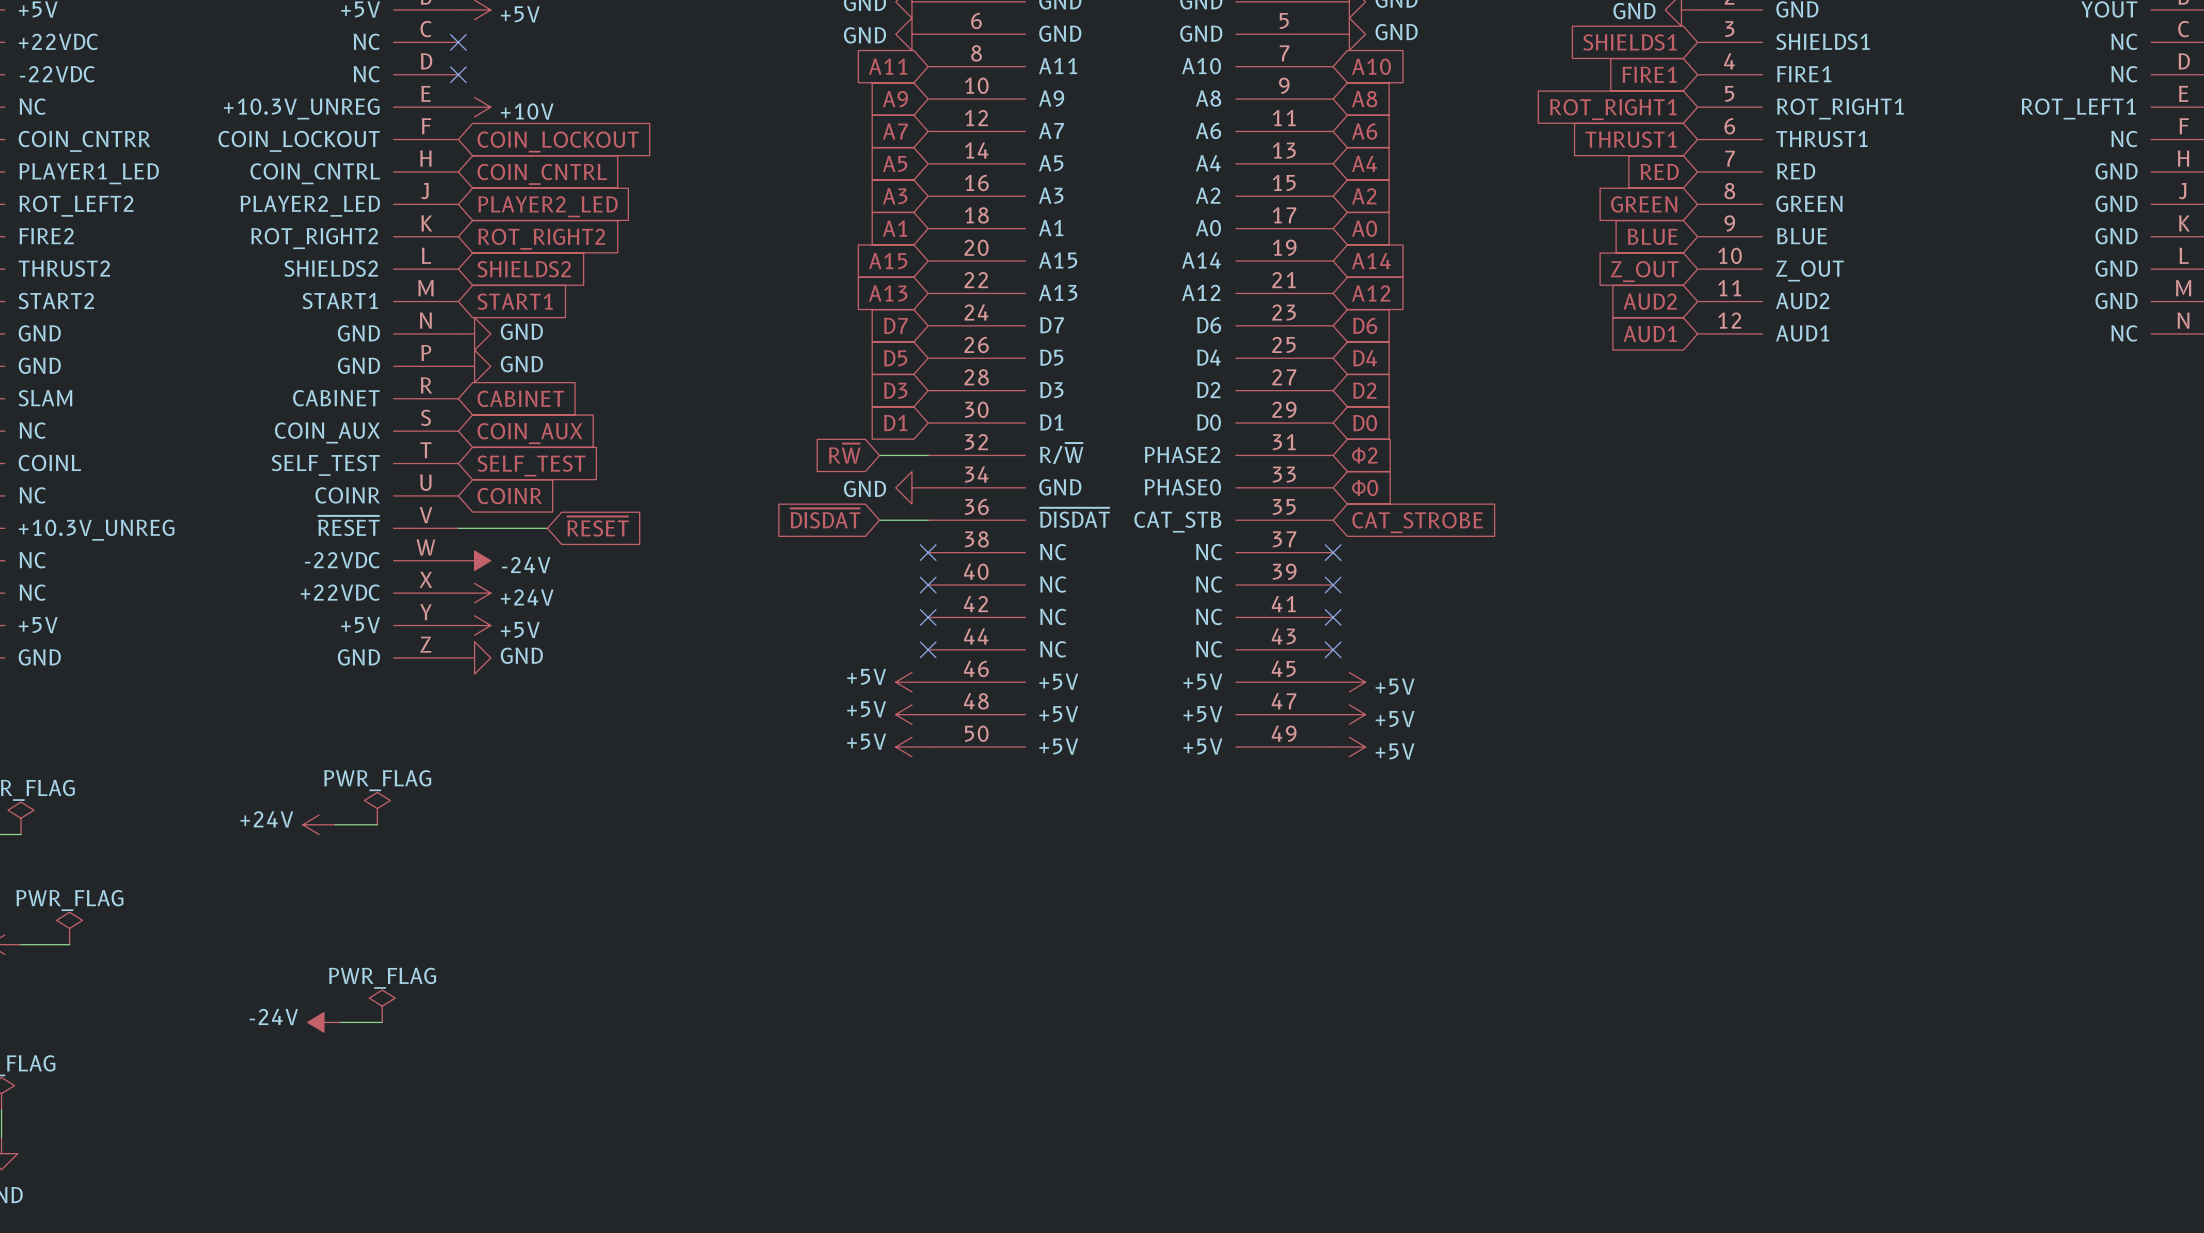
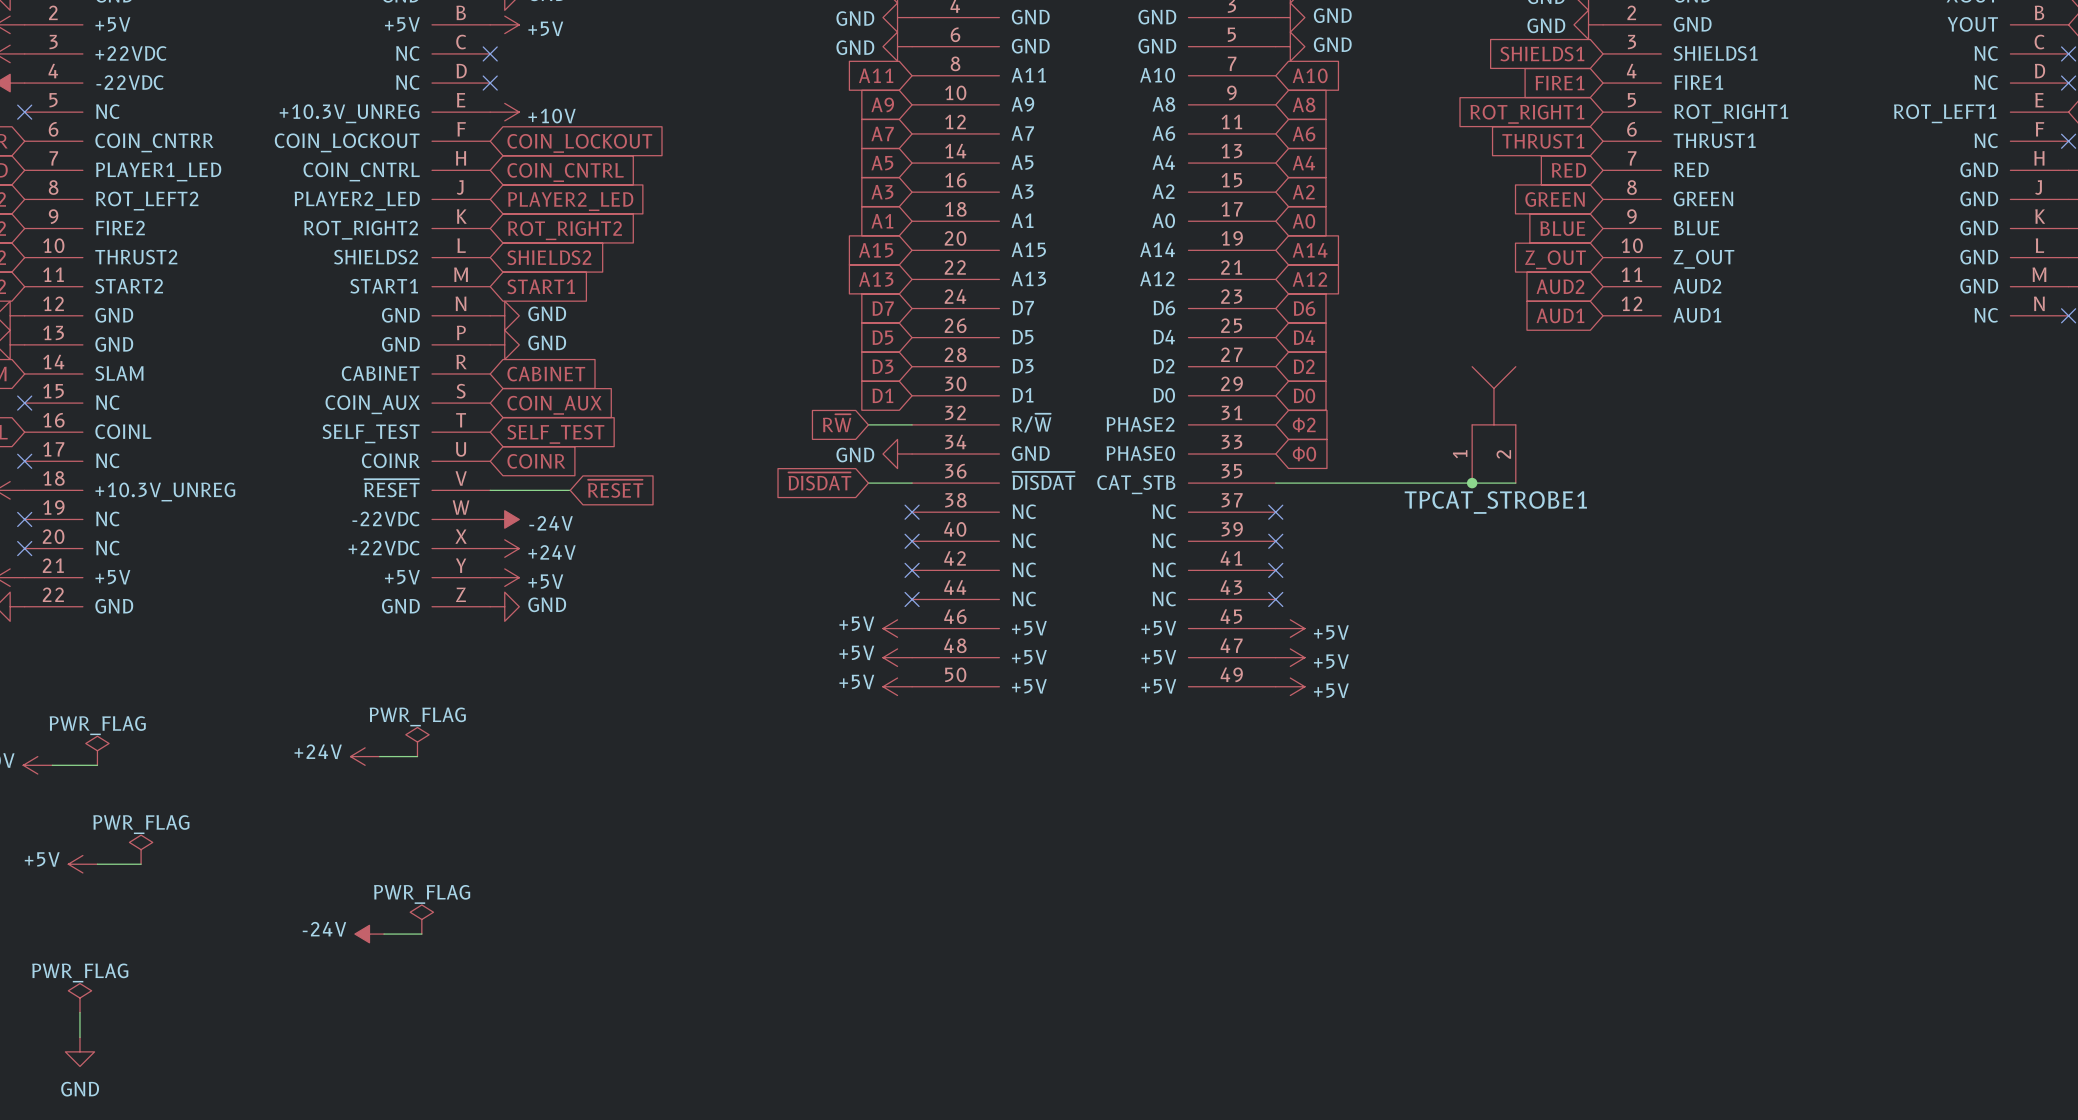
TPCAT_STROBE1: none -> (1493, 424)
wire: none -> (1275, 483) (1515, 483)
junction: none -> (1472, 483)
global label: CAT_STROBE (1417, 522) -> none

